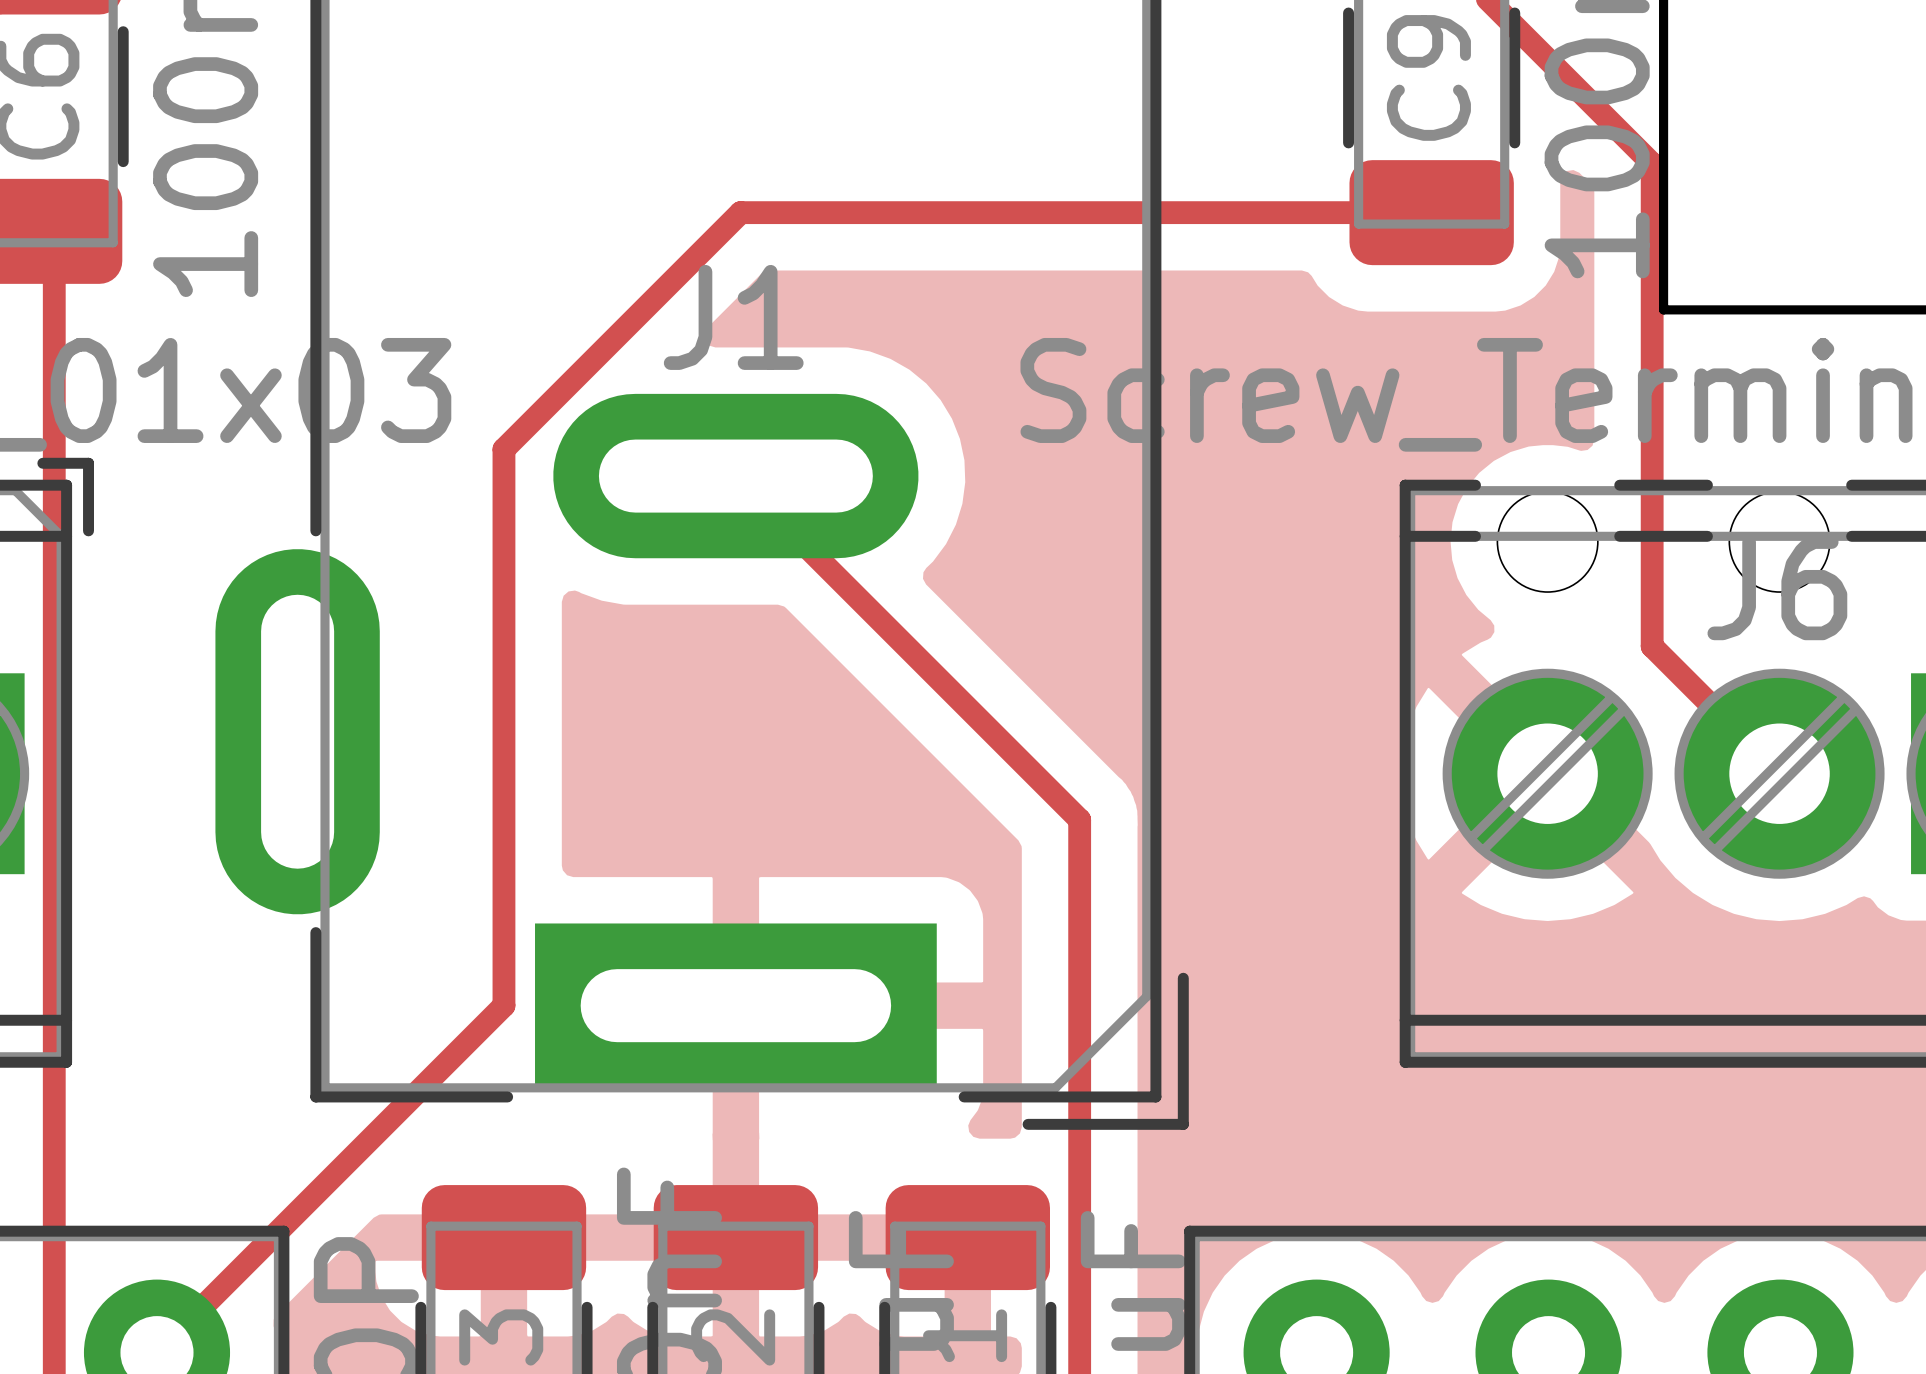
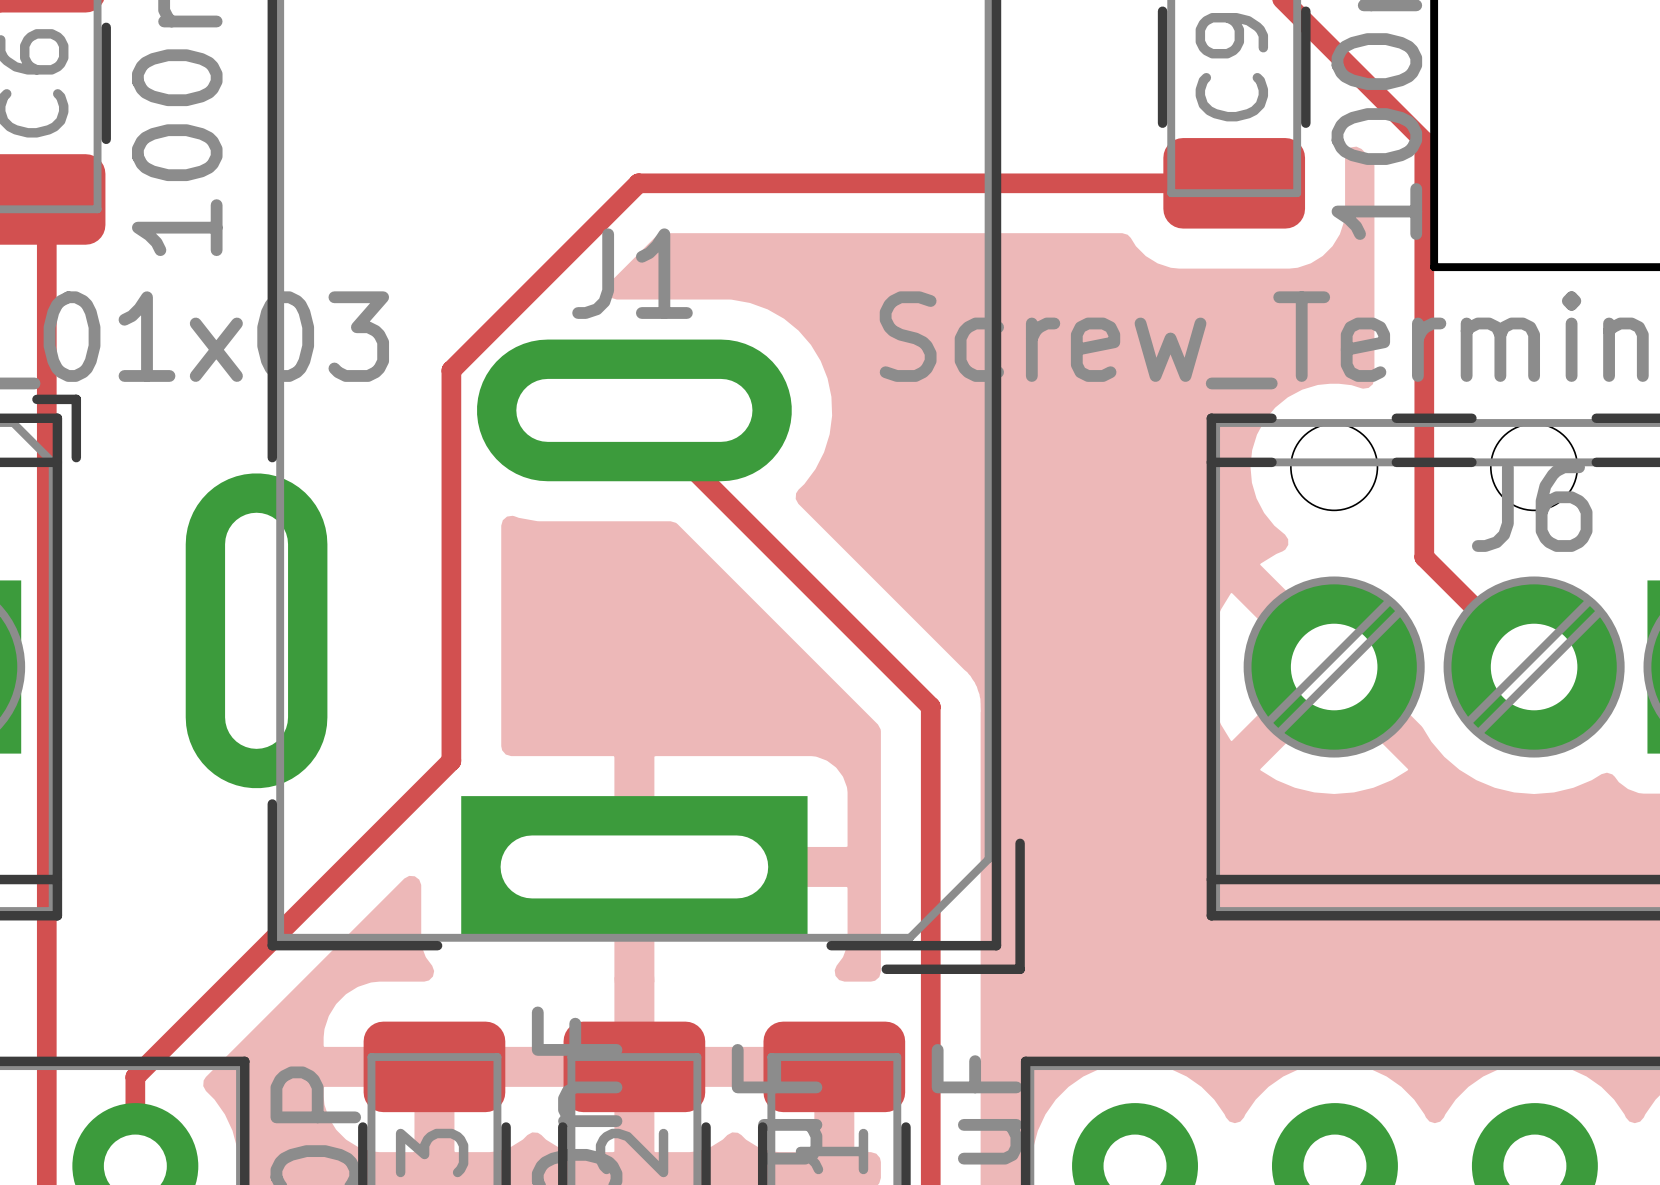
track: (523, 429) (503, 449) (503, 1005) (156, 1352) -> (451, 370) (451, 760) (135, 1077) (135, 1166)

